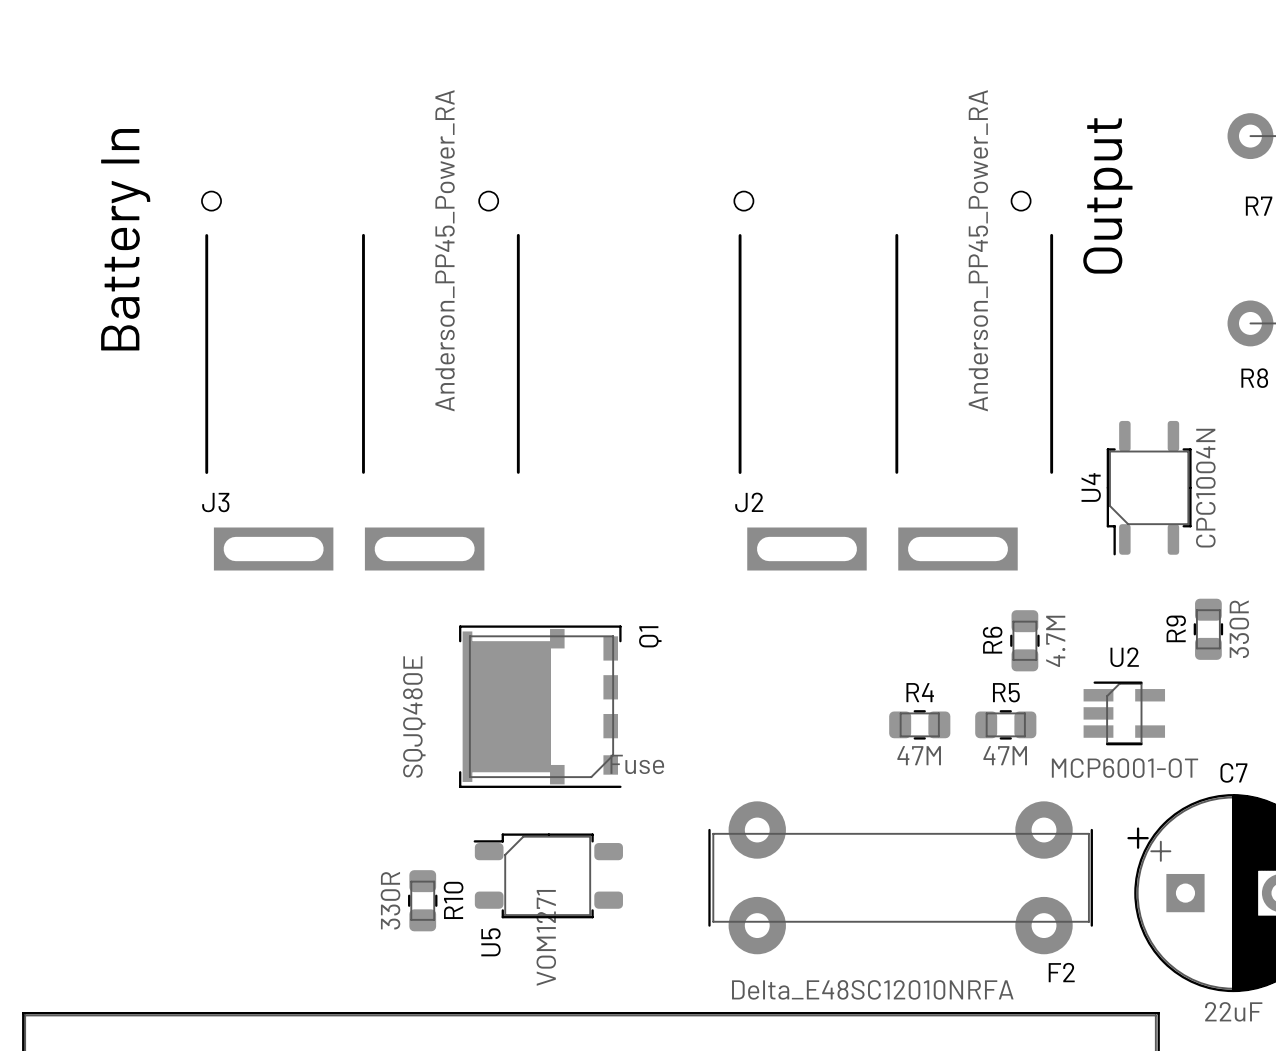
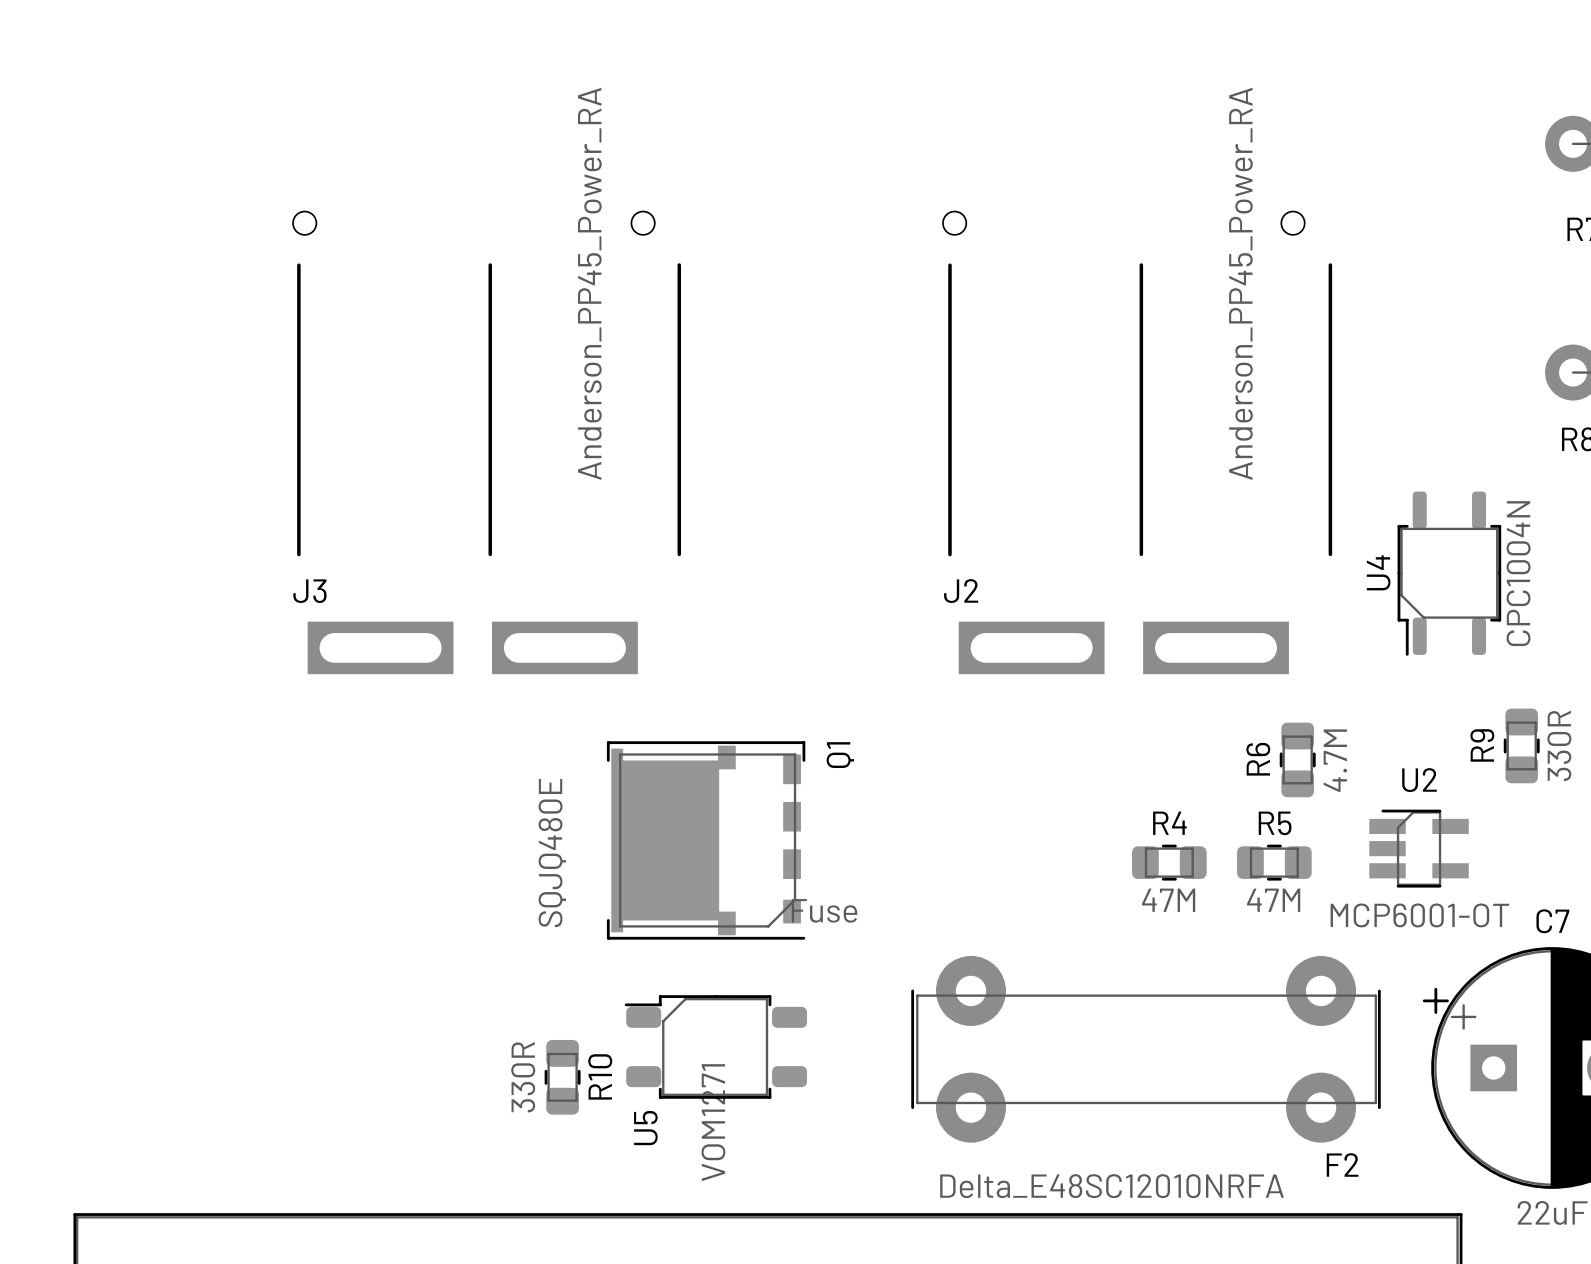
text: Output (1107, 195) -> none
text: Battery In (125, 239) -> none

